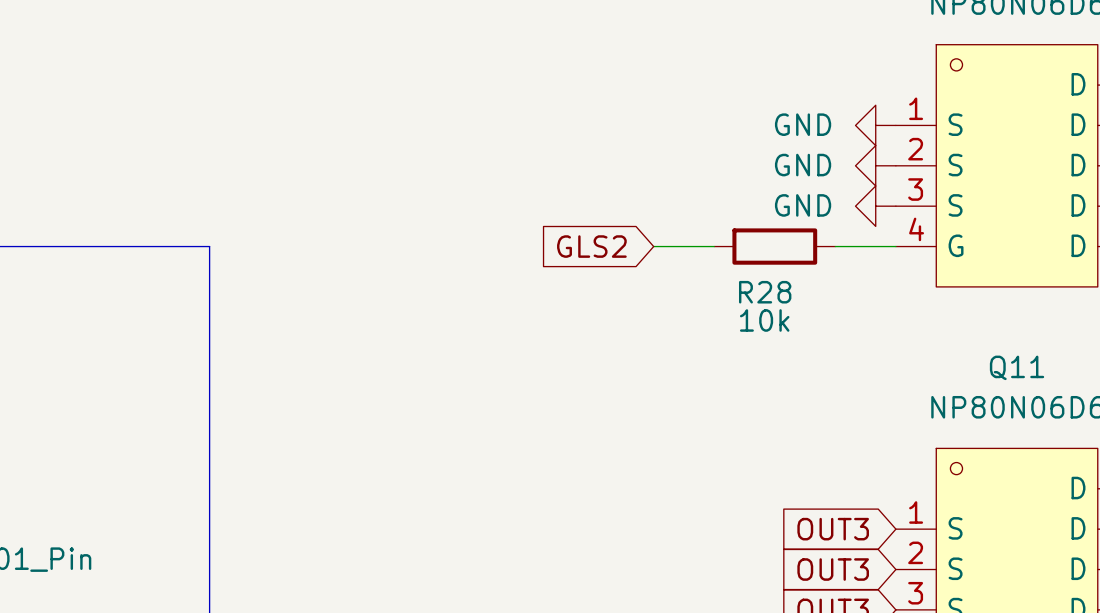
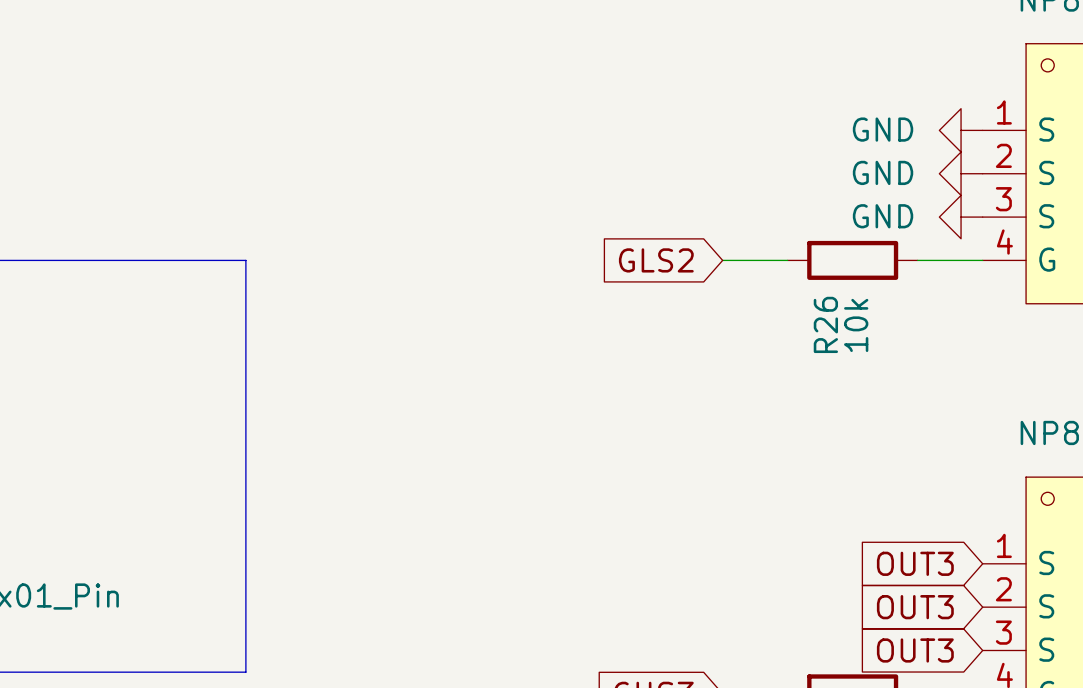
R28 name: R28 (765, 292) -> R26 (825, 324)
R28 value rotation: 0° (764, 320) -> 90° counterclockwise (856, 325)

